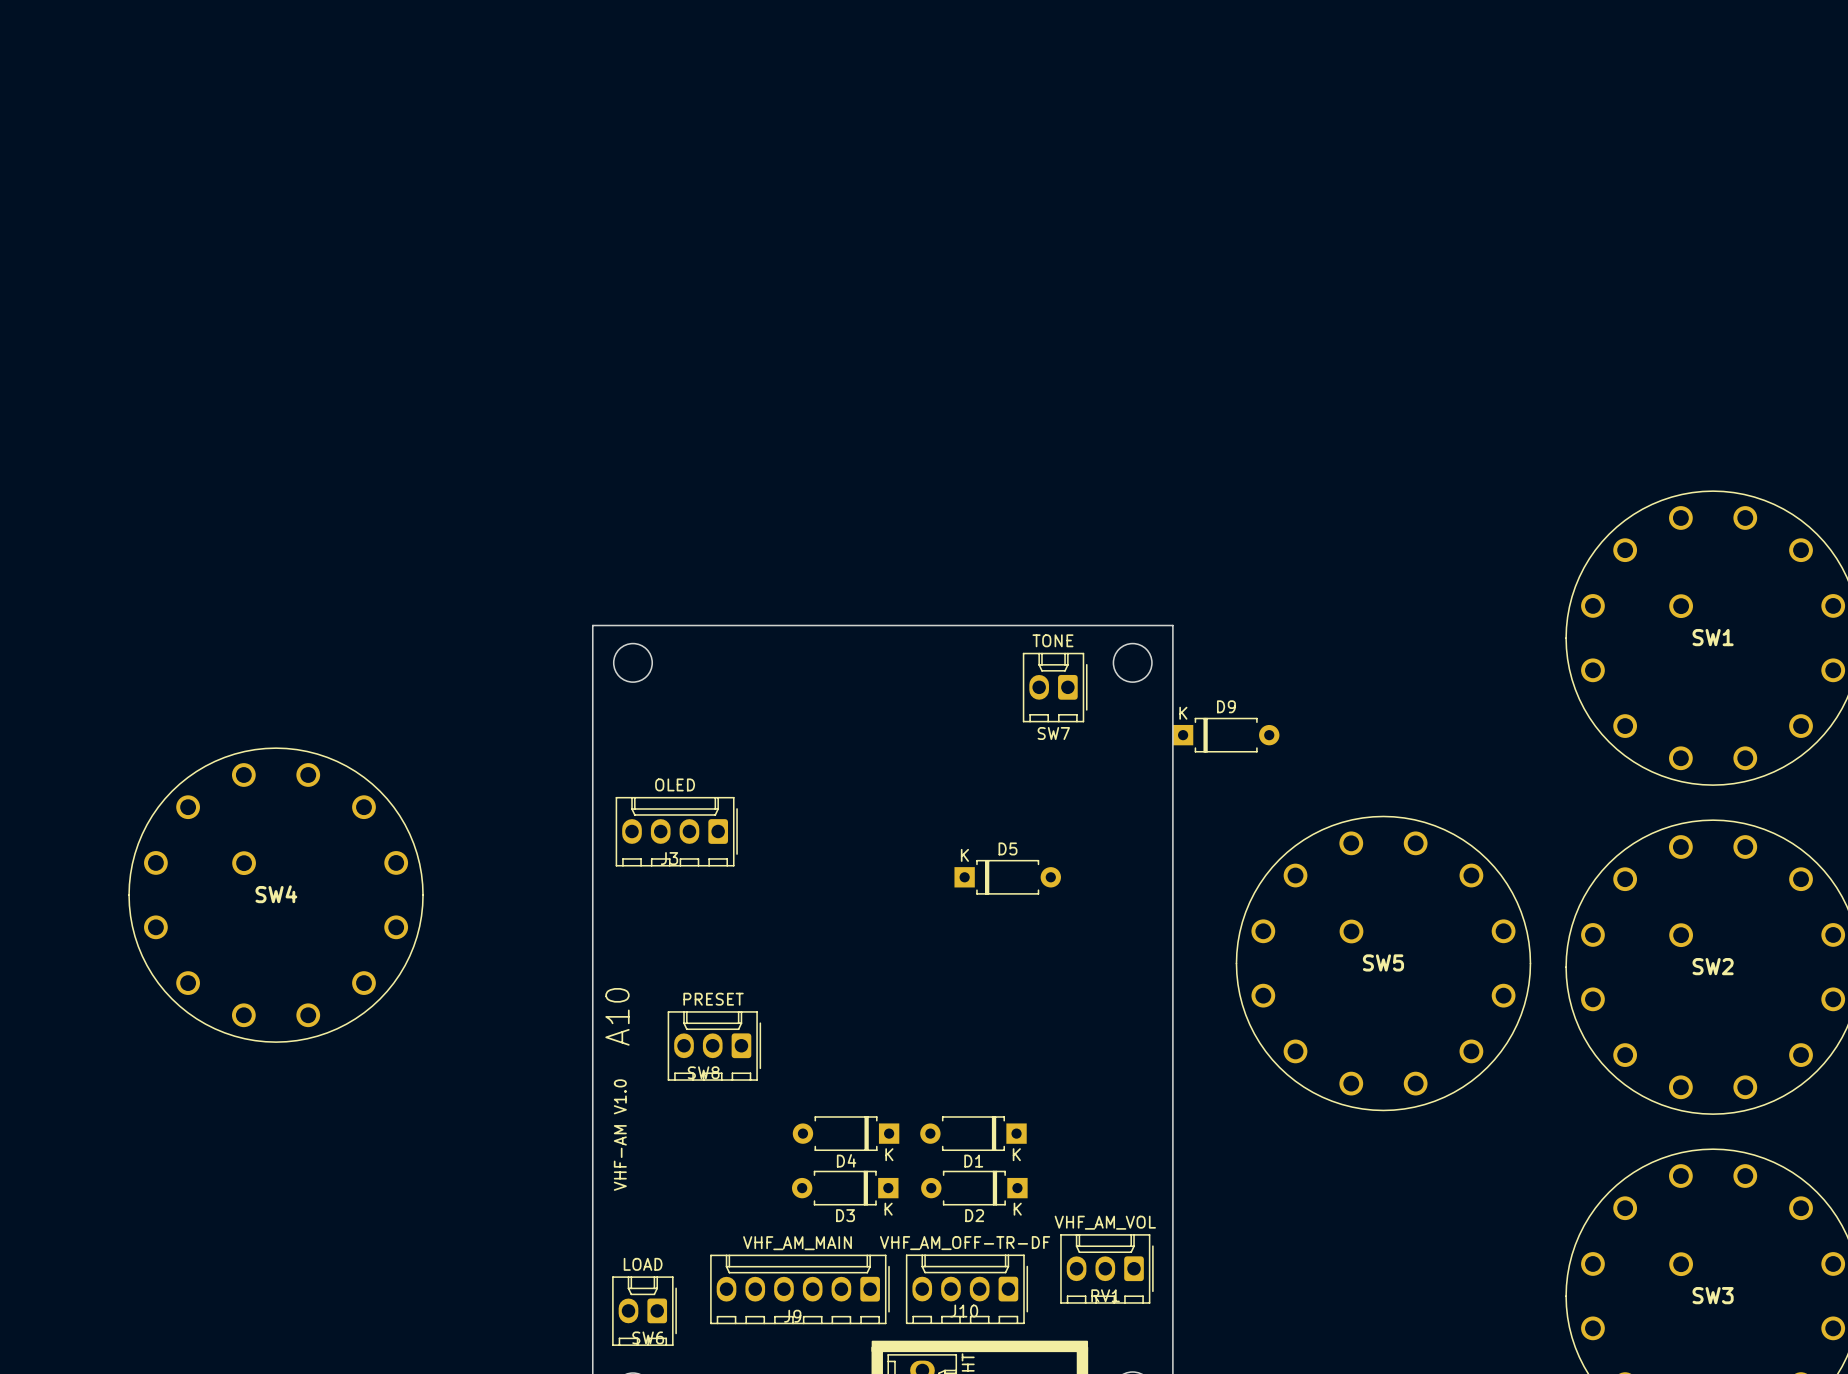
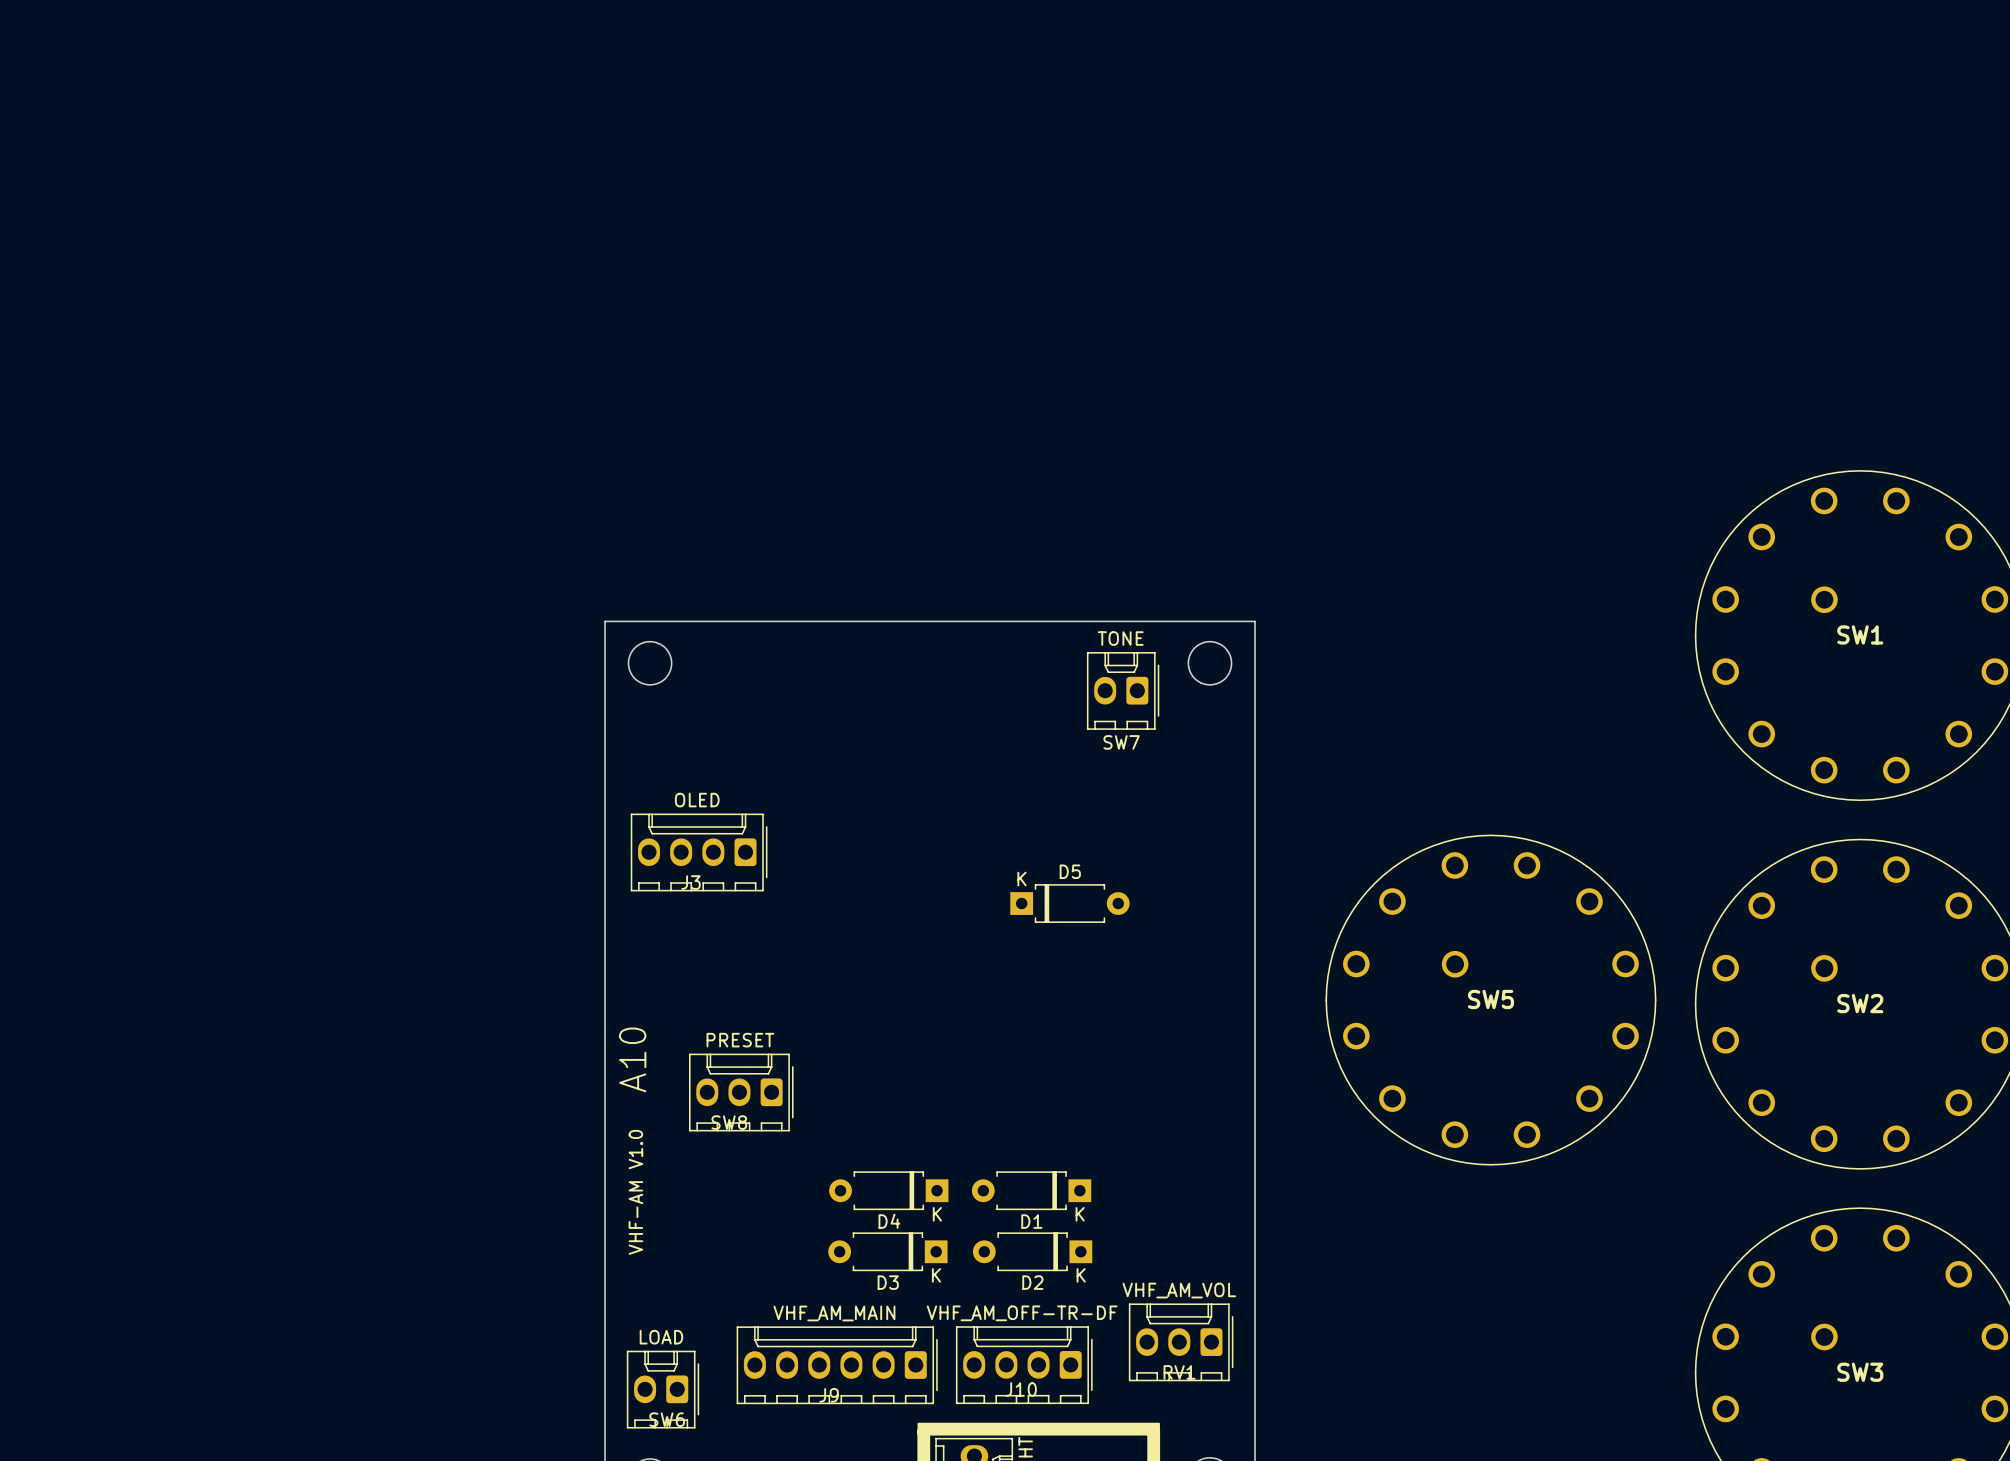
D9: (1226, 735) -> none
SW4: (276, 895) -> none

